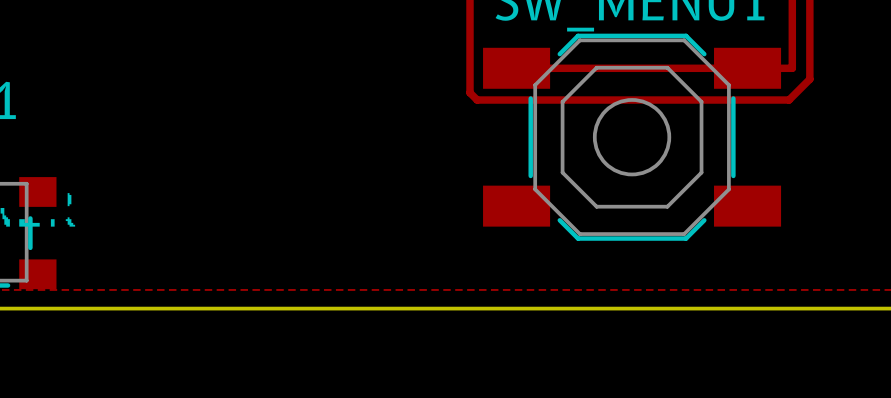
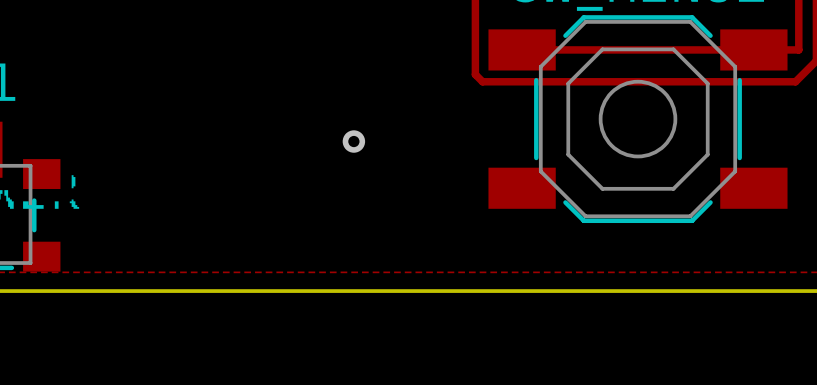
via: none -> (353, 141)

